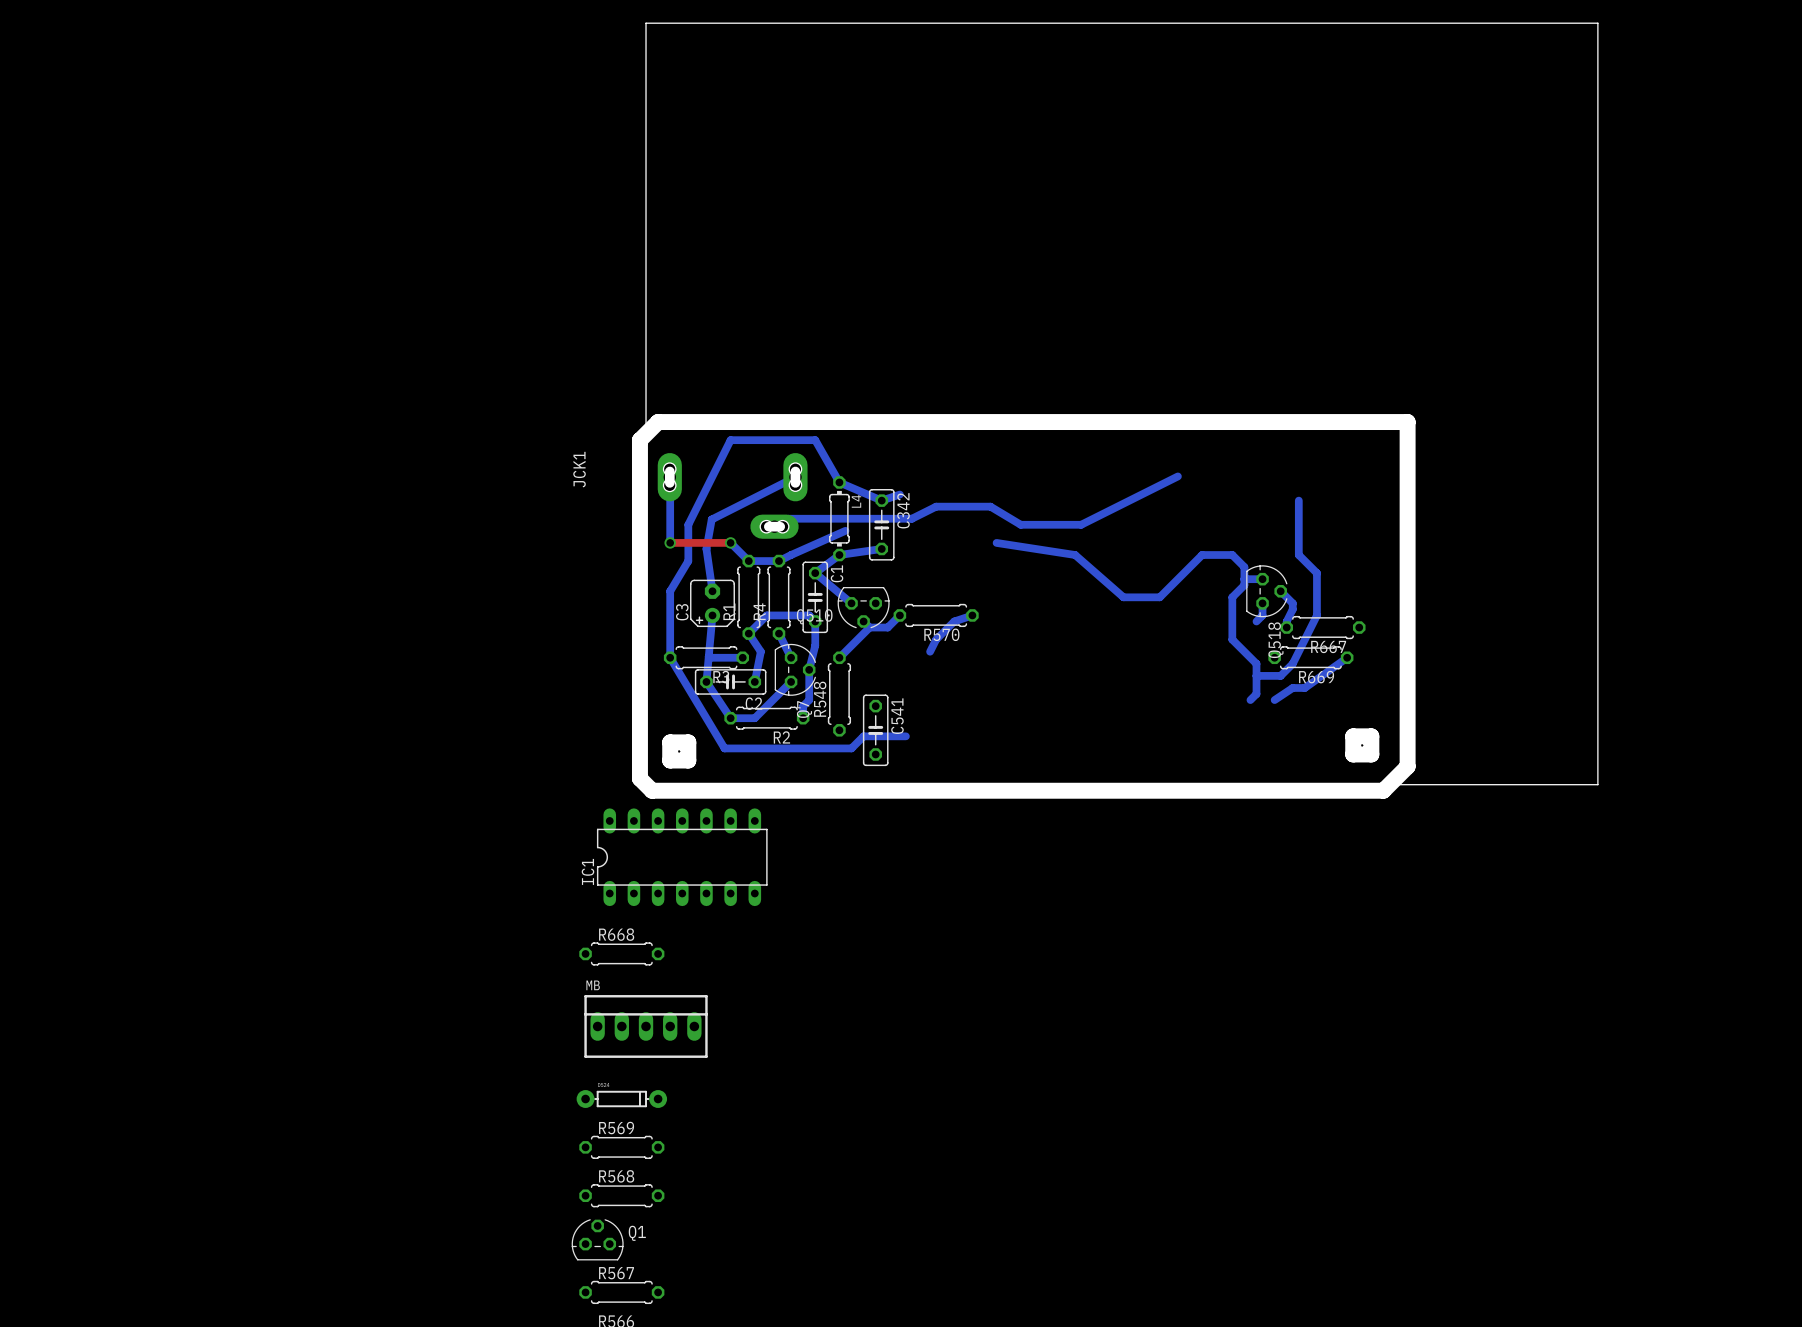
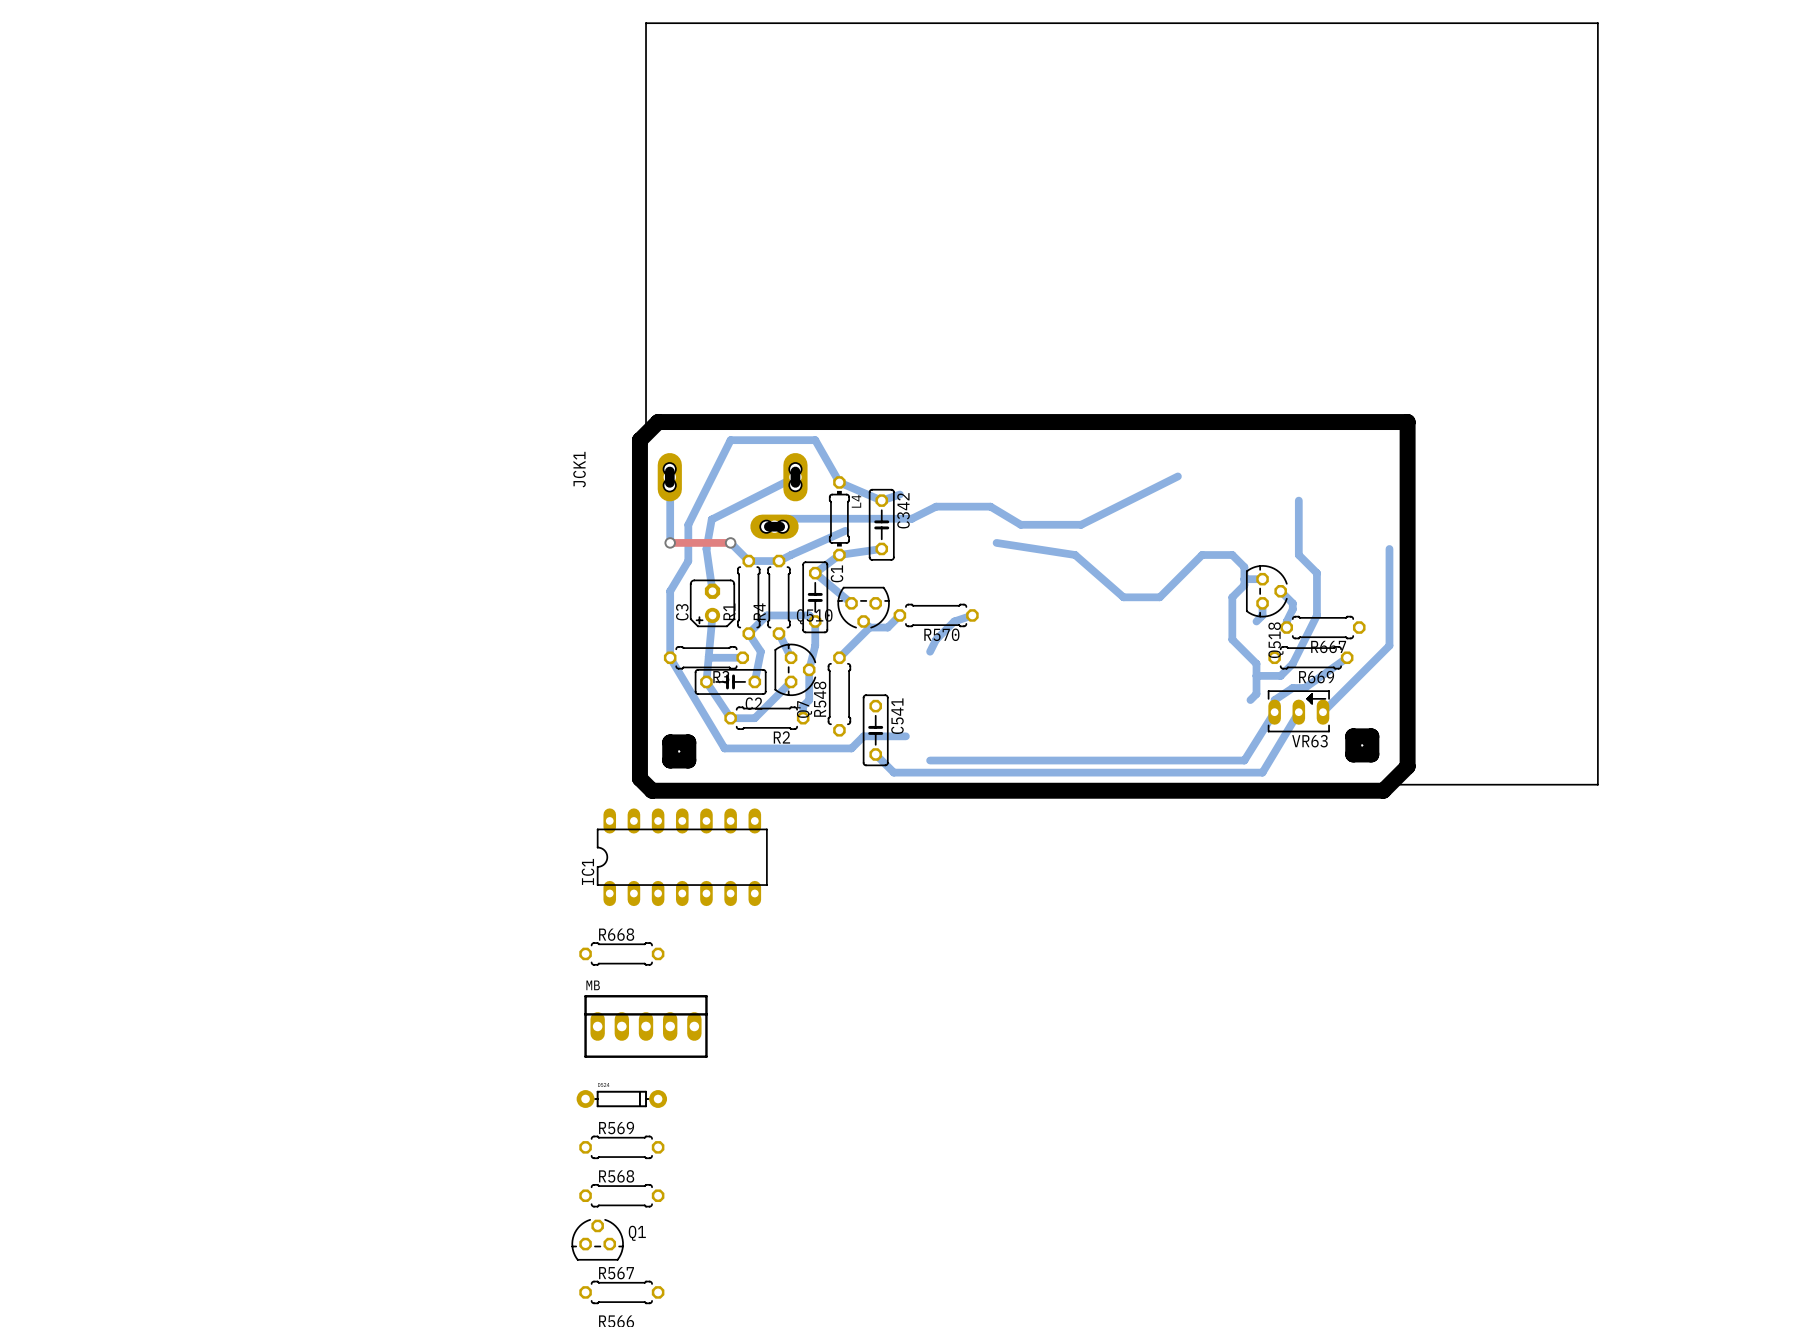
bottom track: none -> (1389, 548) (1389, 645) (1322, 712)
bottom track: none -> (1274, 700) (1274, 712) (1244, 760) (930, 760)
VR63: none -> (1298, 711)
bottom track: none -> (1298, 712) (1262, 772) (893, 772) (875, 754)

